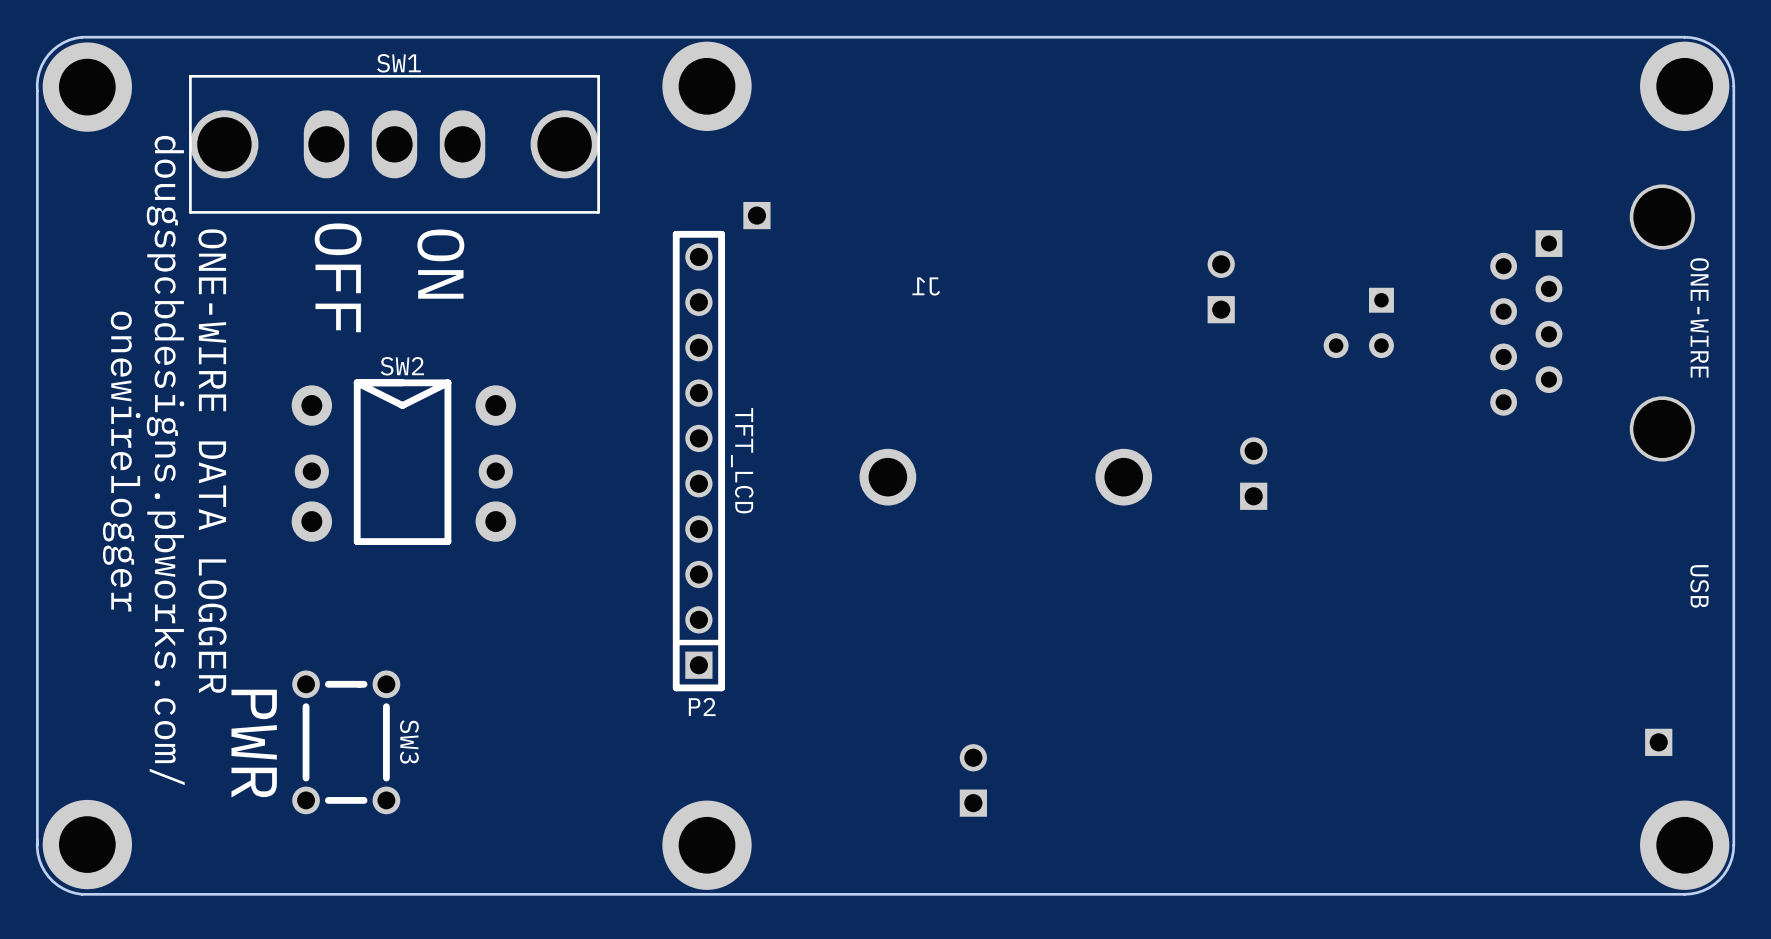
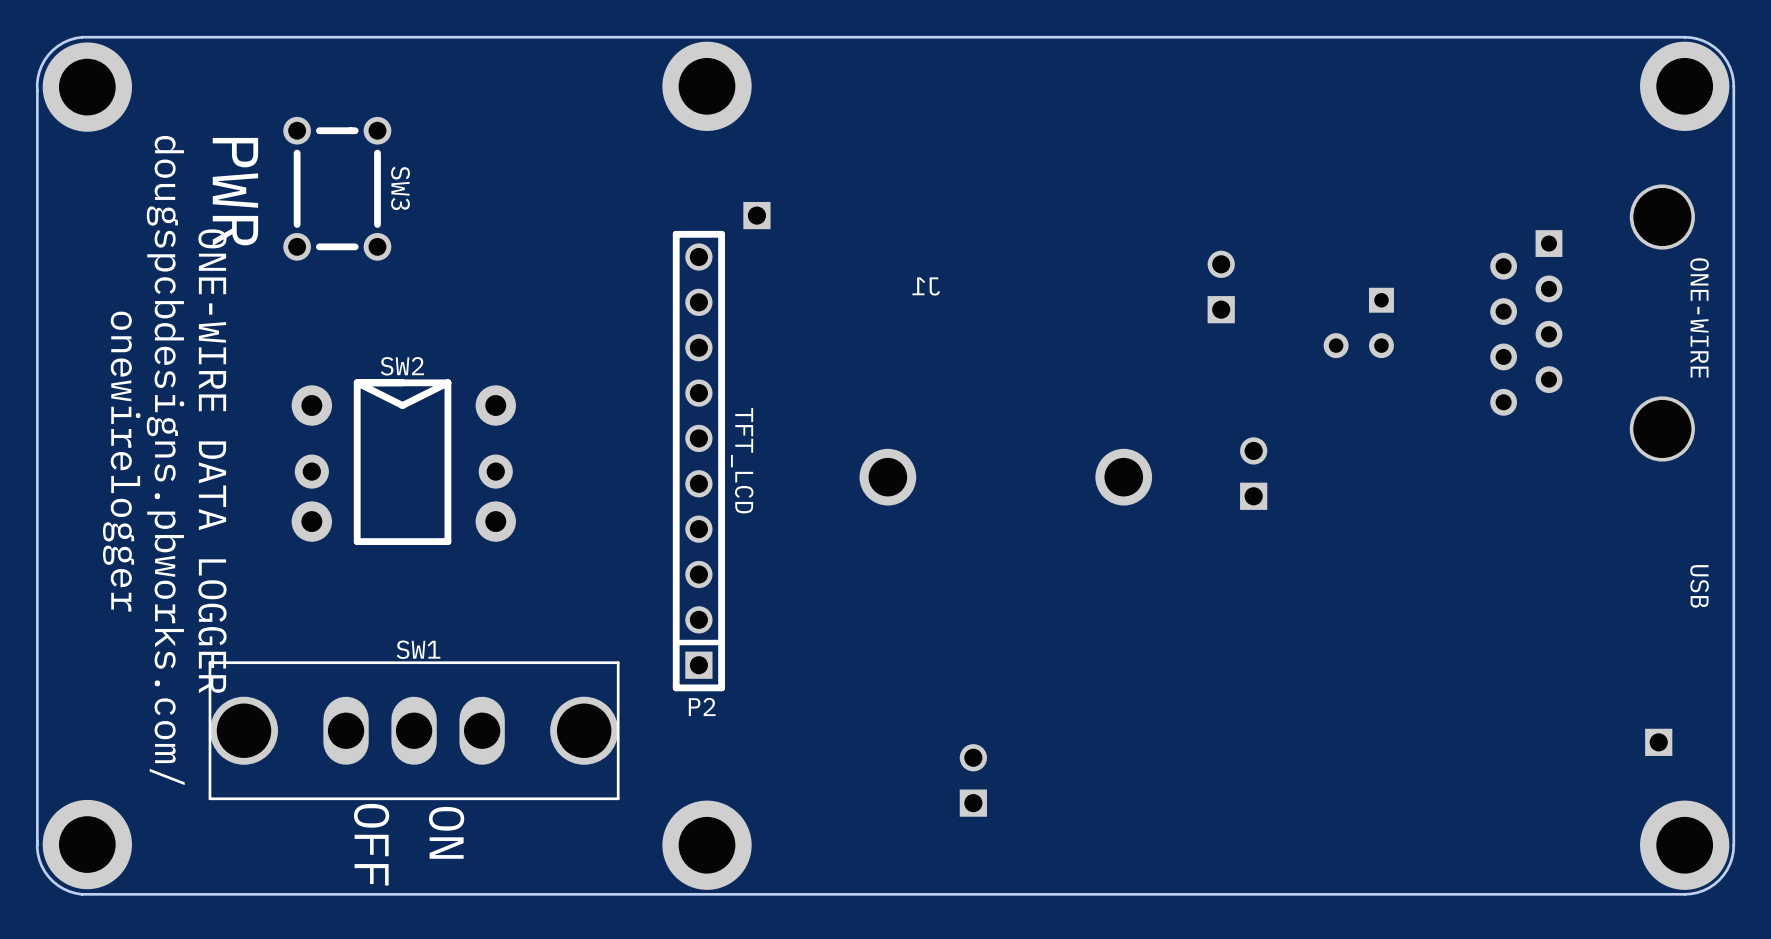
SW1 position: (394, 144) -> (414, 730)
text: none -> PWR (235, 191)
text: ON (440, 264) -> none
text: OFF (338, 277) -> none
SW3 position: (346, 742) -> (337, 188)
text: PWR (254, 743) -> none
text: none -> ON (446, 832)
text: none -> OFF (371, 844)

